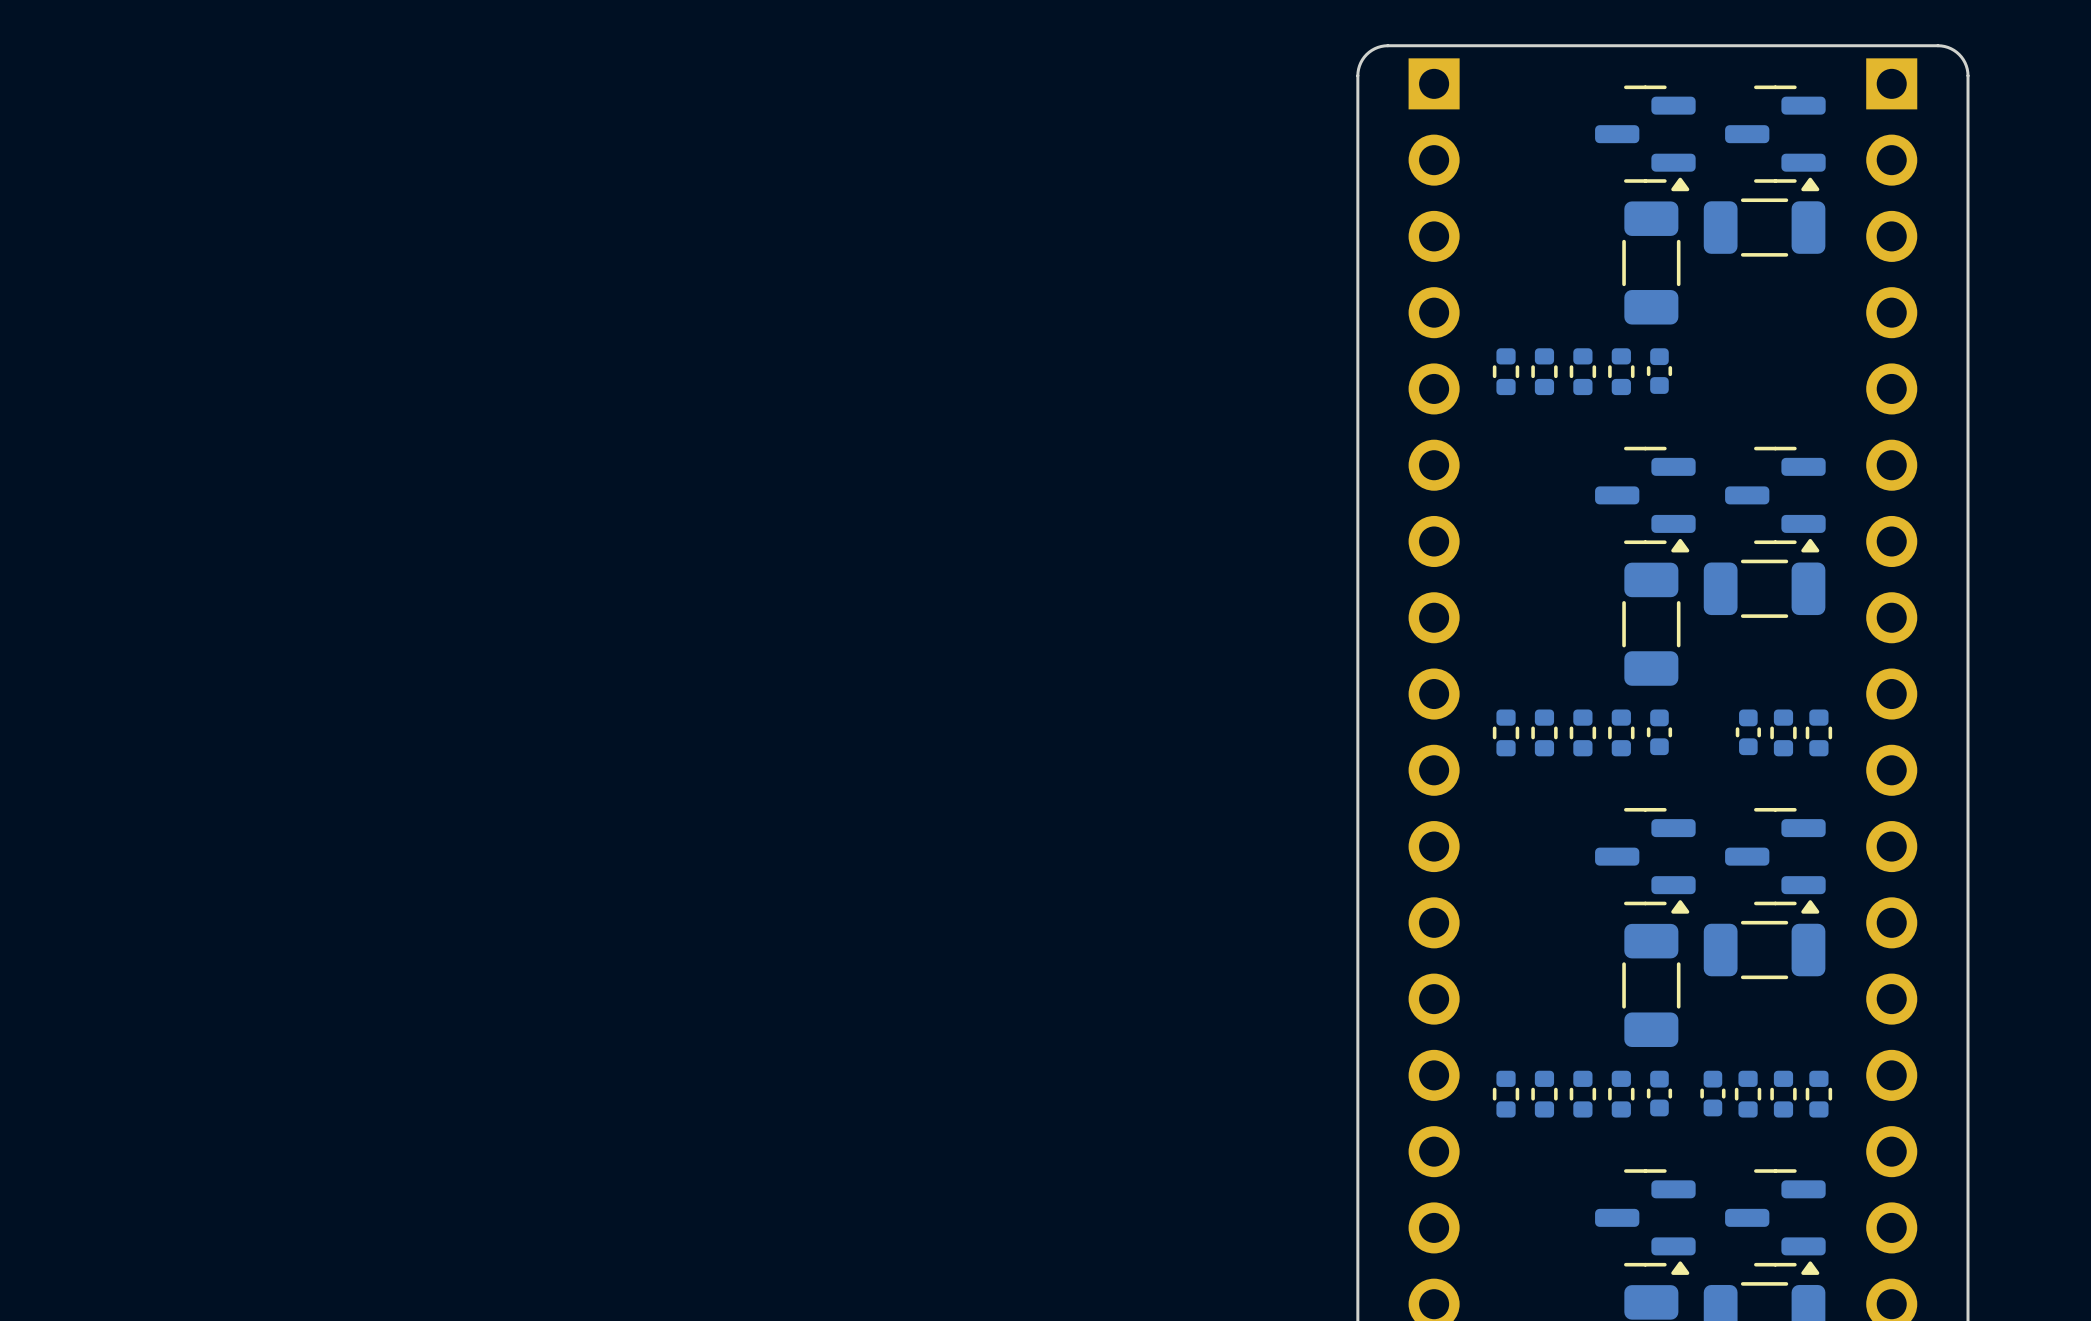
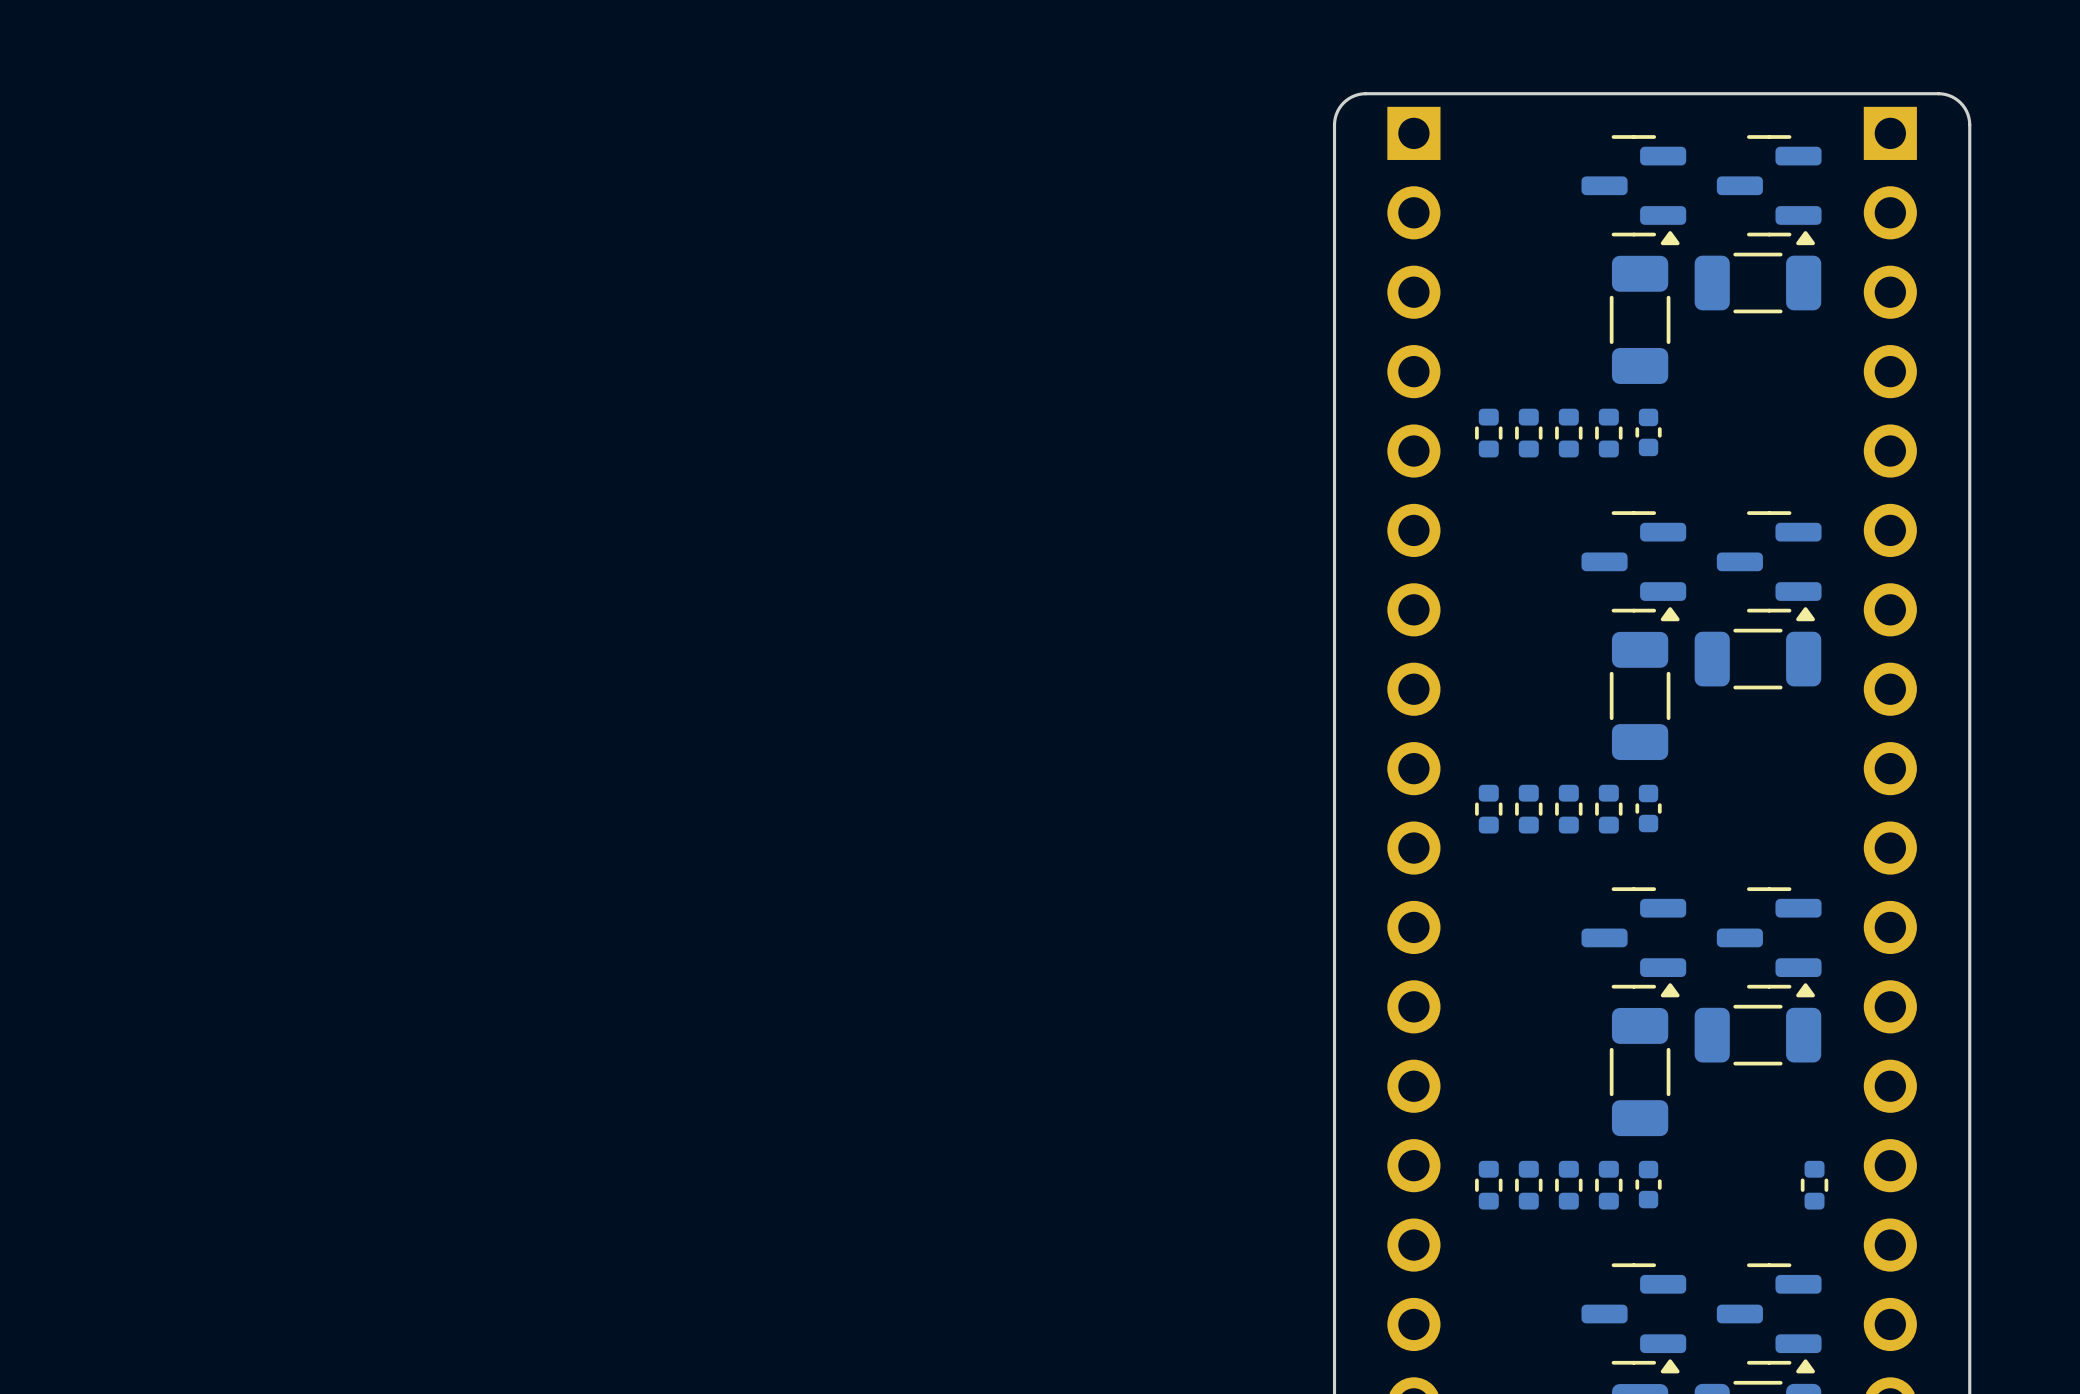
part: (1748, 732) -> none
part: (1783, 732) -> none
part: (1818, 732) -> none
part: (1712, 1093) -> none
part: (1748, 1094) -> none
part: (1783, 1094) -> none

